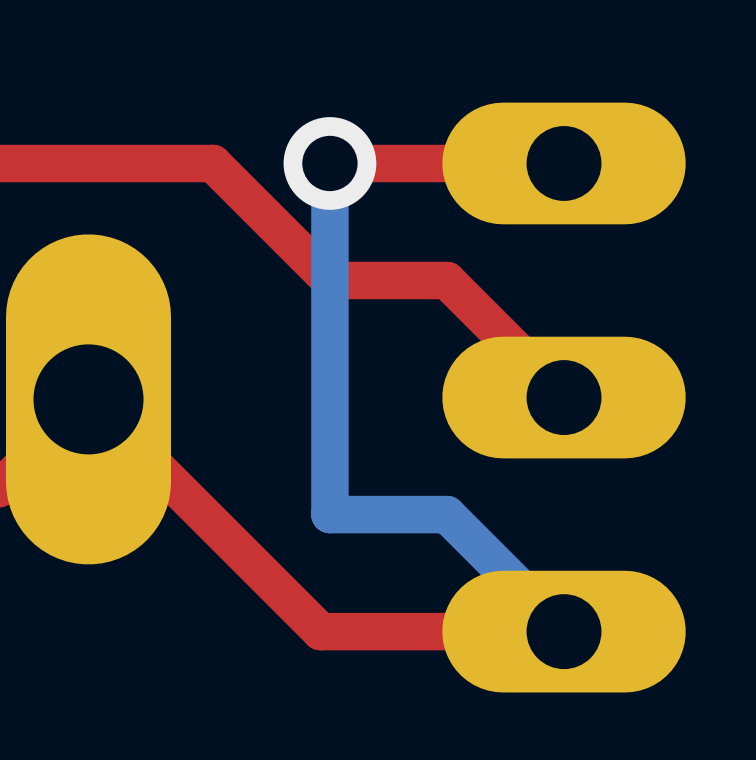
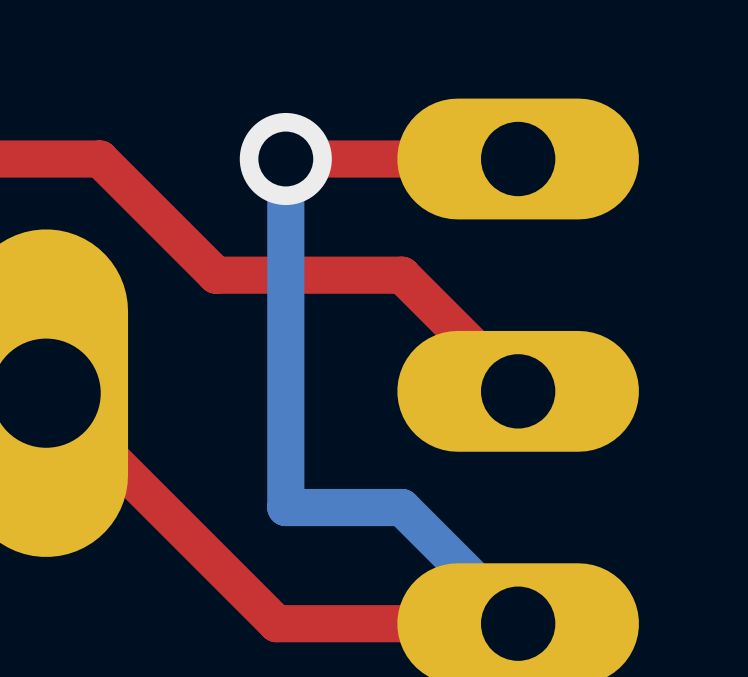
top track: (142, 163) (212, 163) (329, 280) -> (99, 159) (216, 275) (285, 275)

